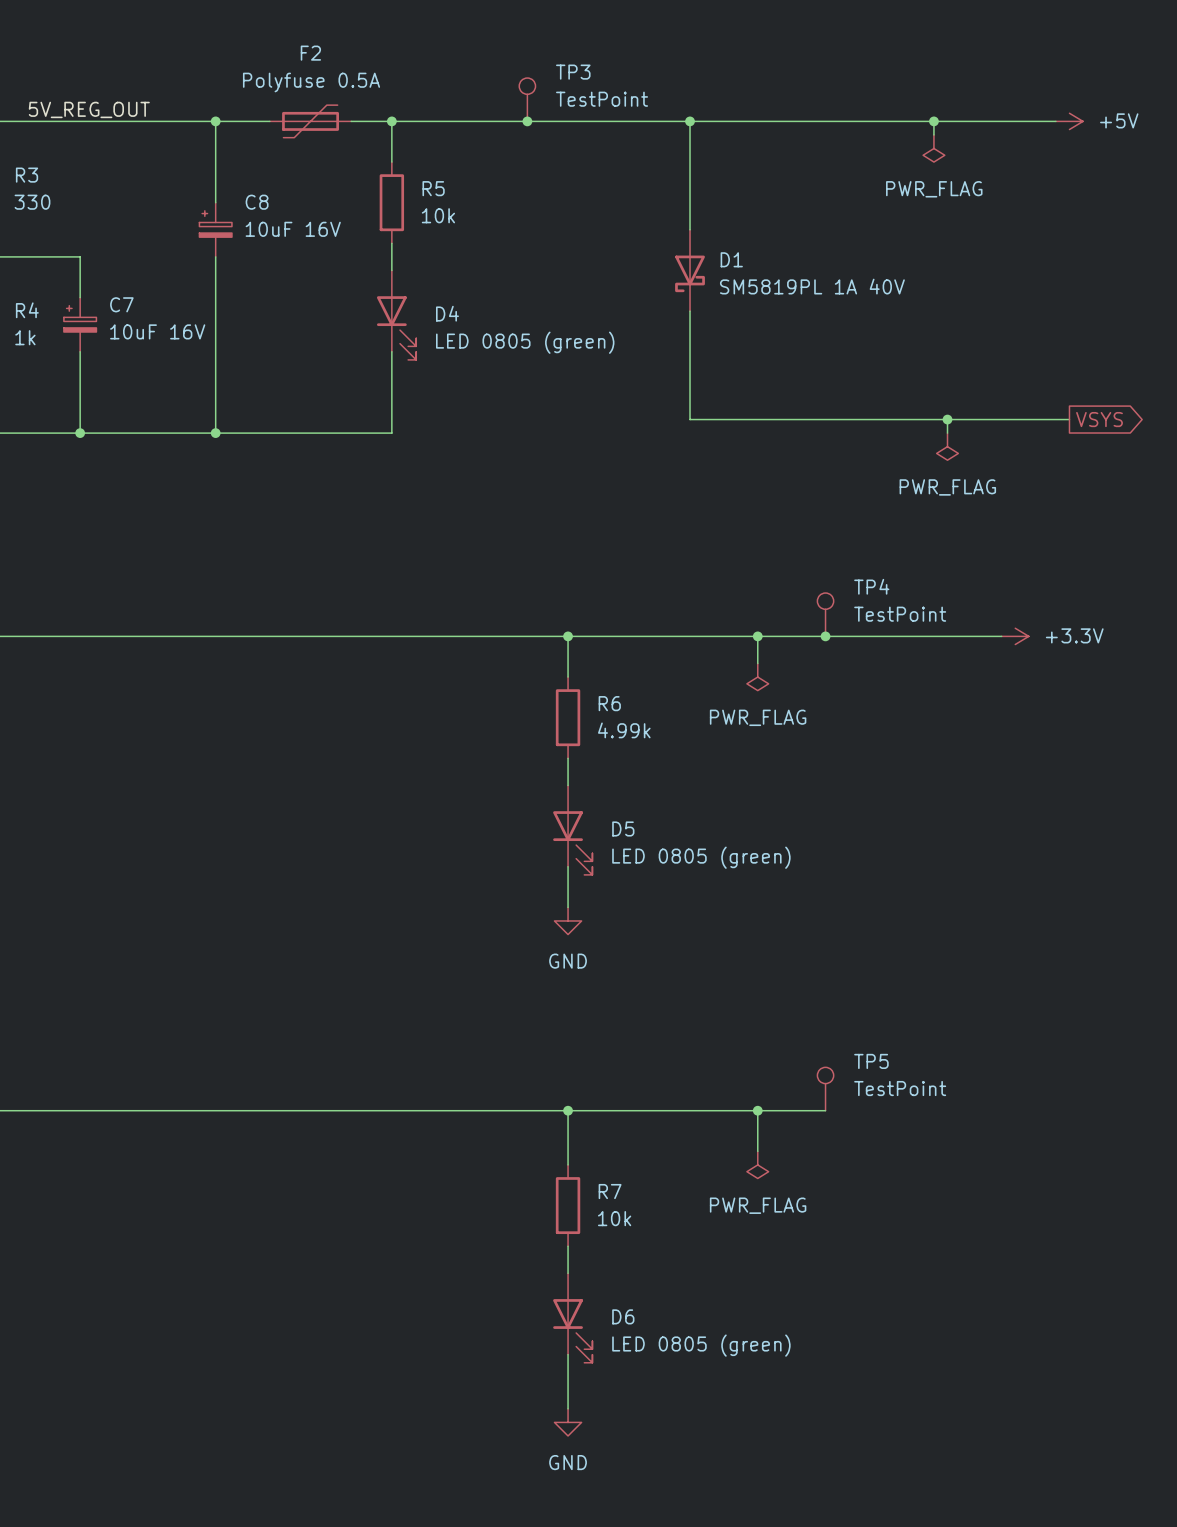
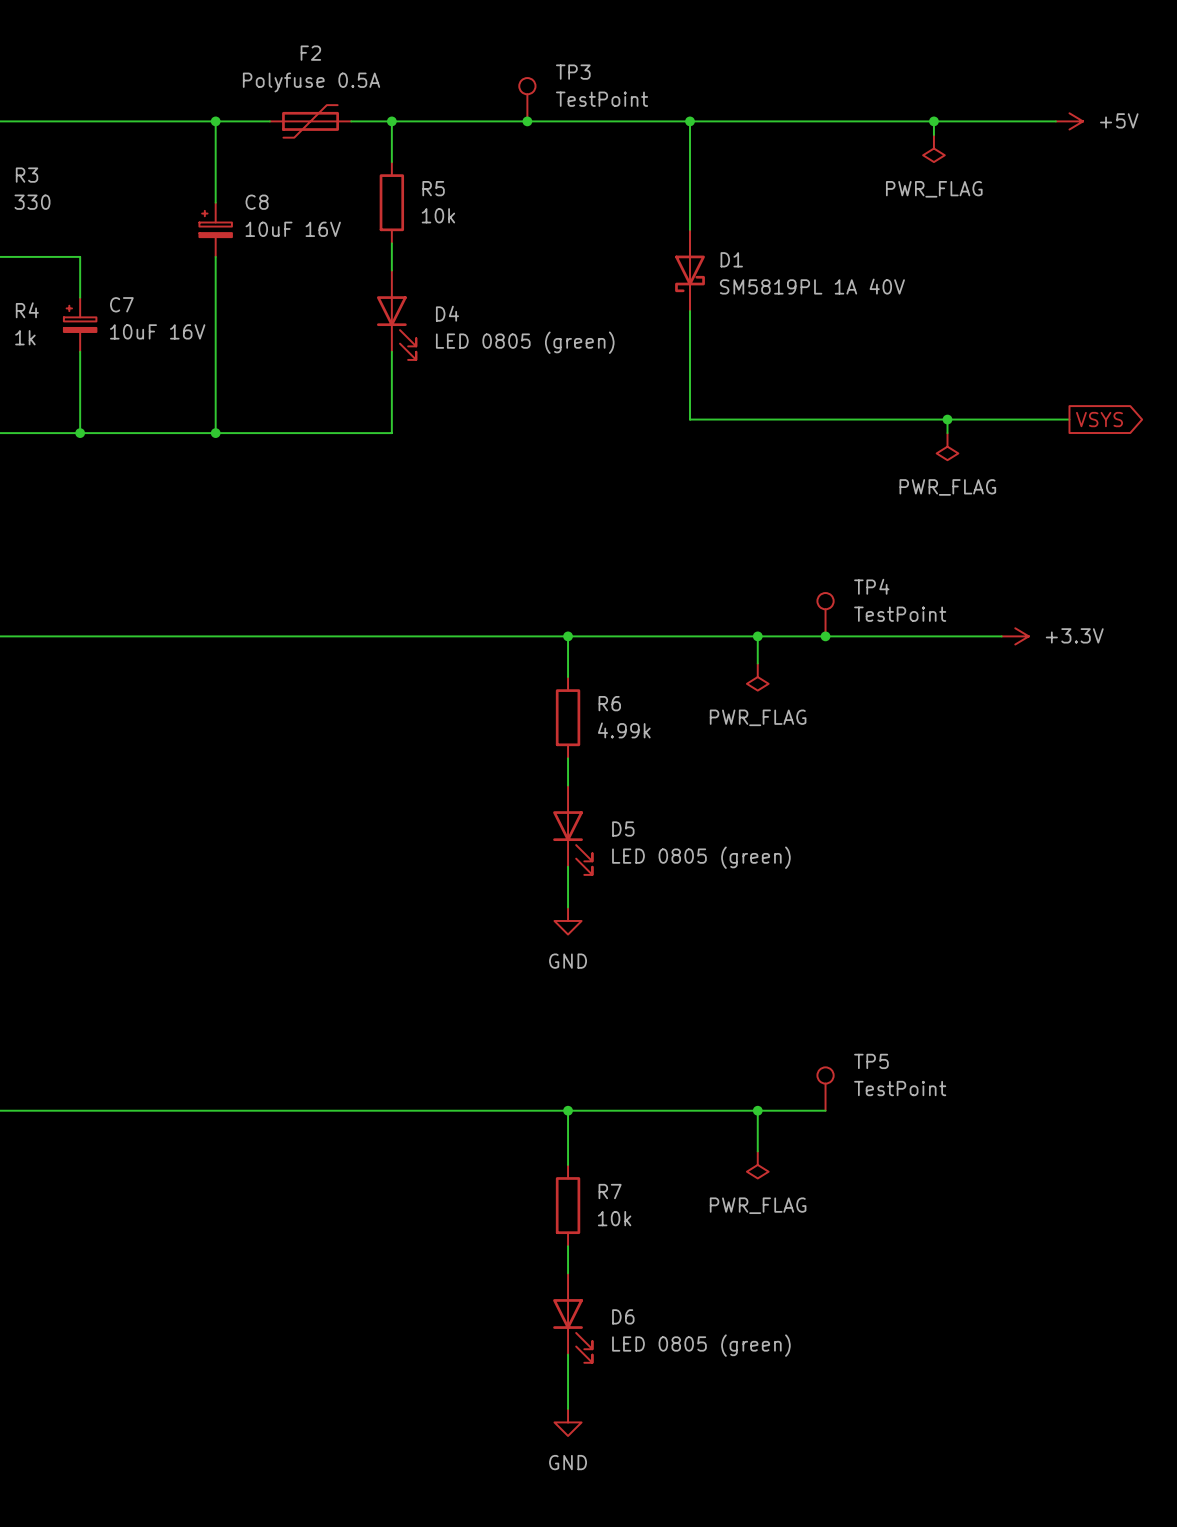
label: 5V_REG_OUT (89, 109) -> none

